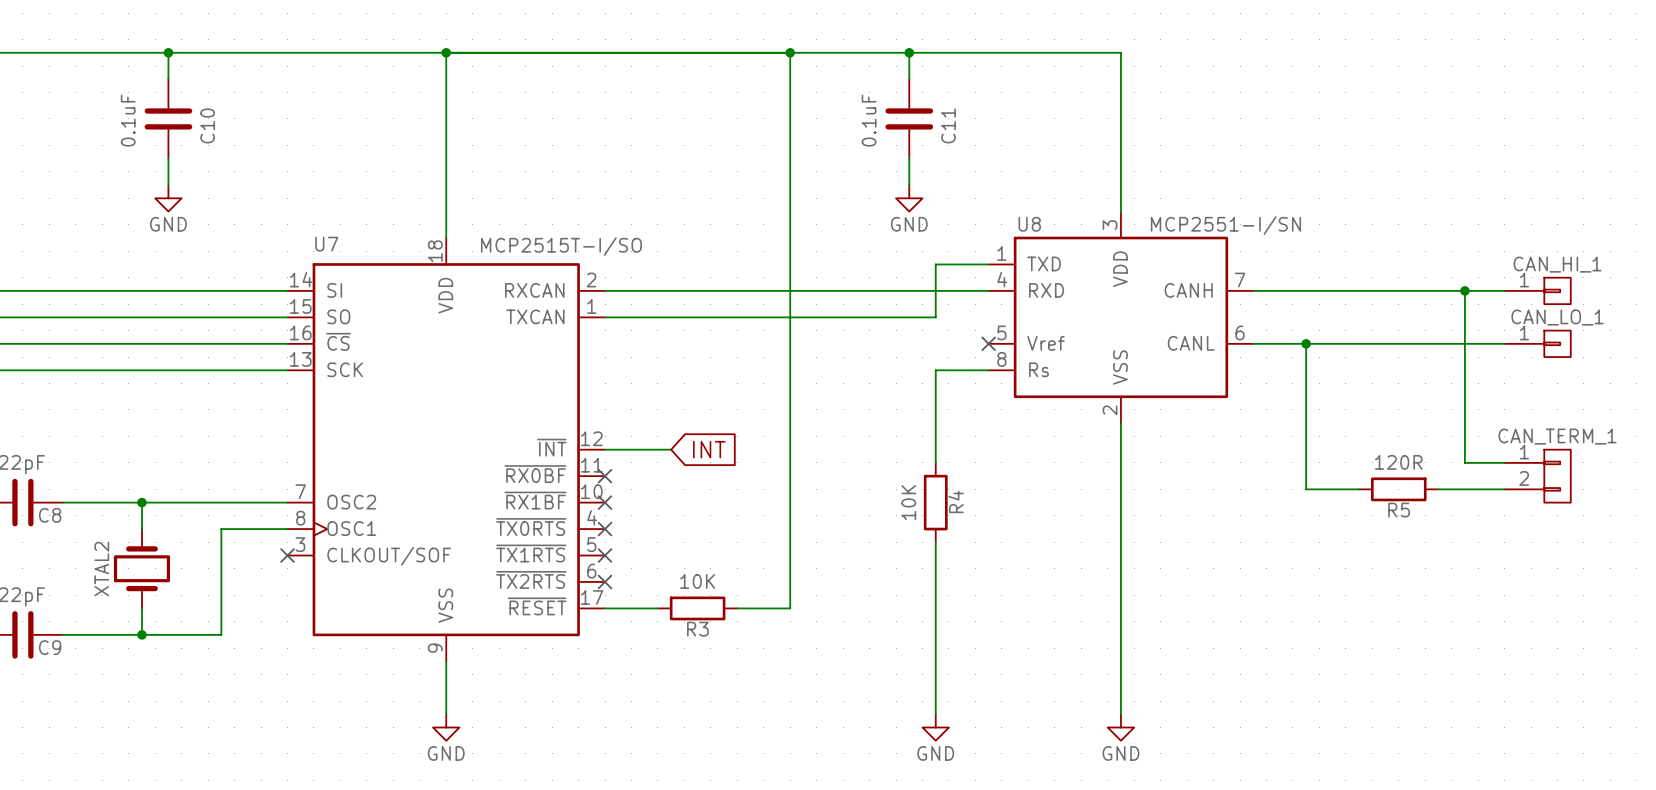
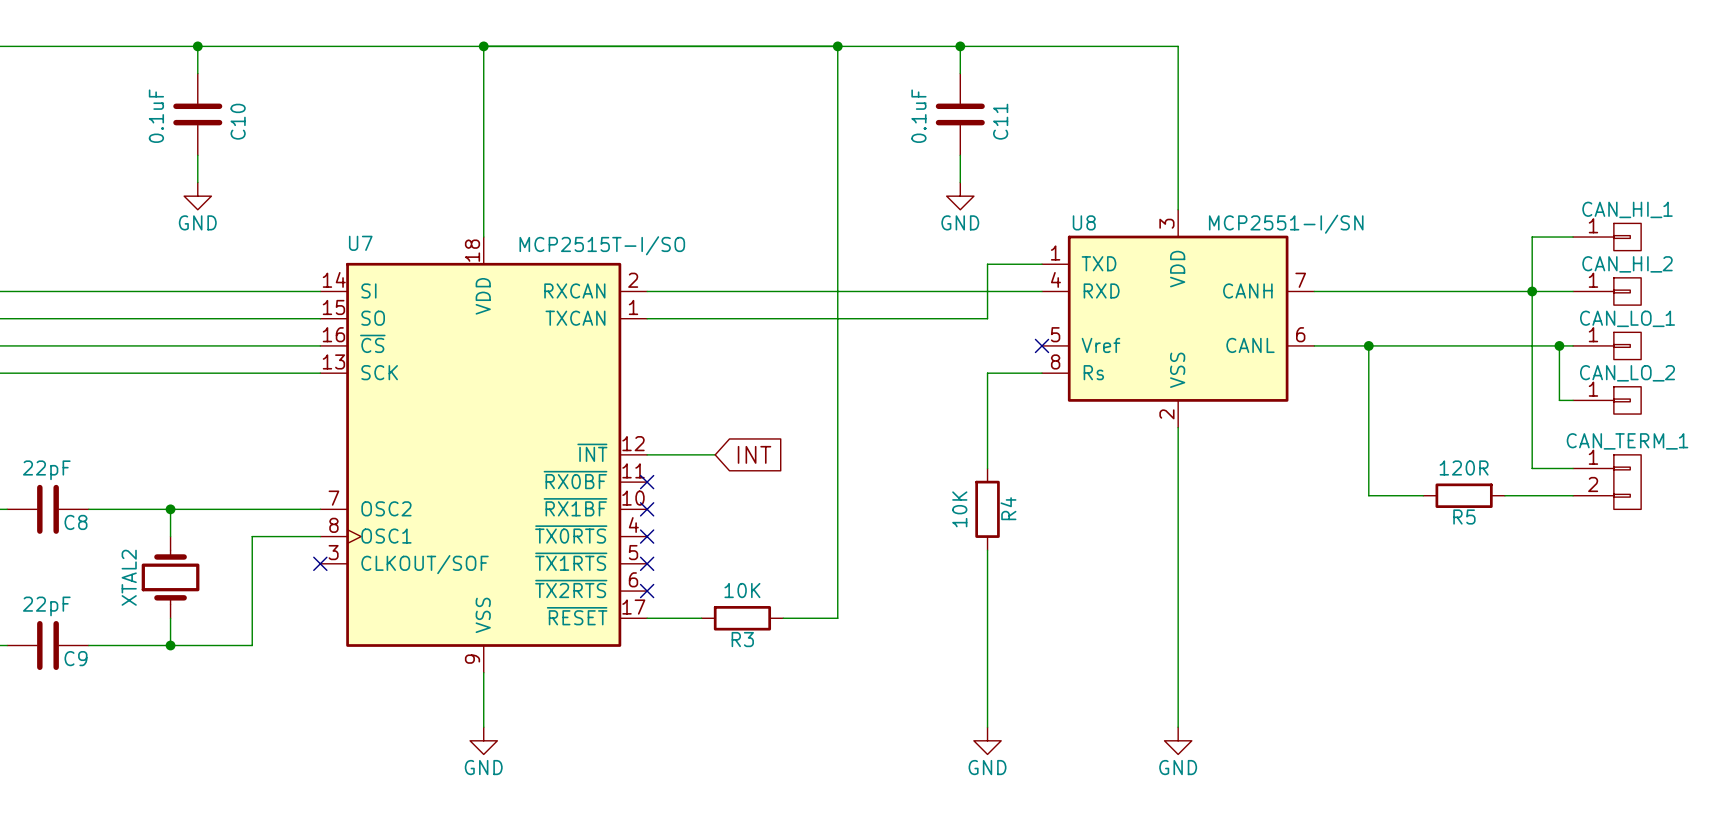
wire: none -> (1573, 237) (1532, 237) (1532, 291)
CAN_HI_1: none -> (1607, 237)
CAN_HI_1 name: CAN_HI_1 (1557, 264) -> CAN_HI_2 (1627, 264)
wire: none -> (1559, 345) (1559, 400) (1573, 400)
junction: none -> (1559, 345)
CAN_LO_2: none -> (1607, 400)

